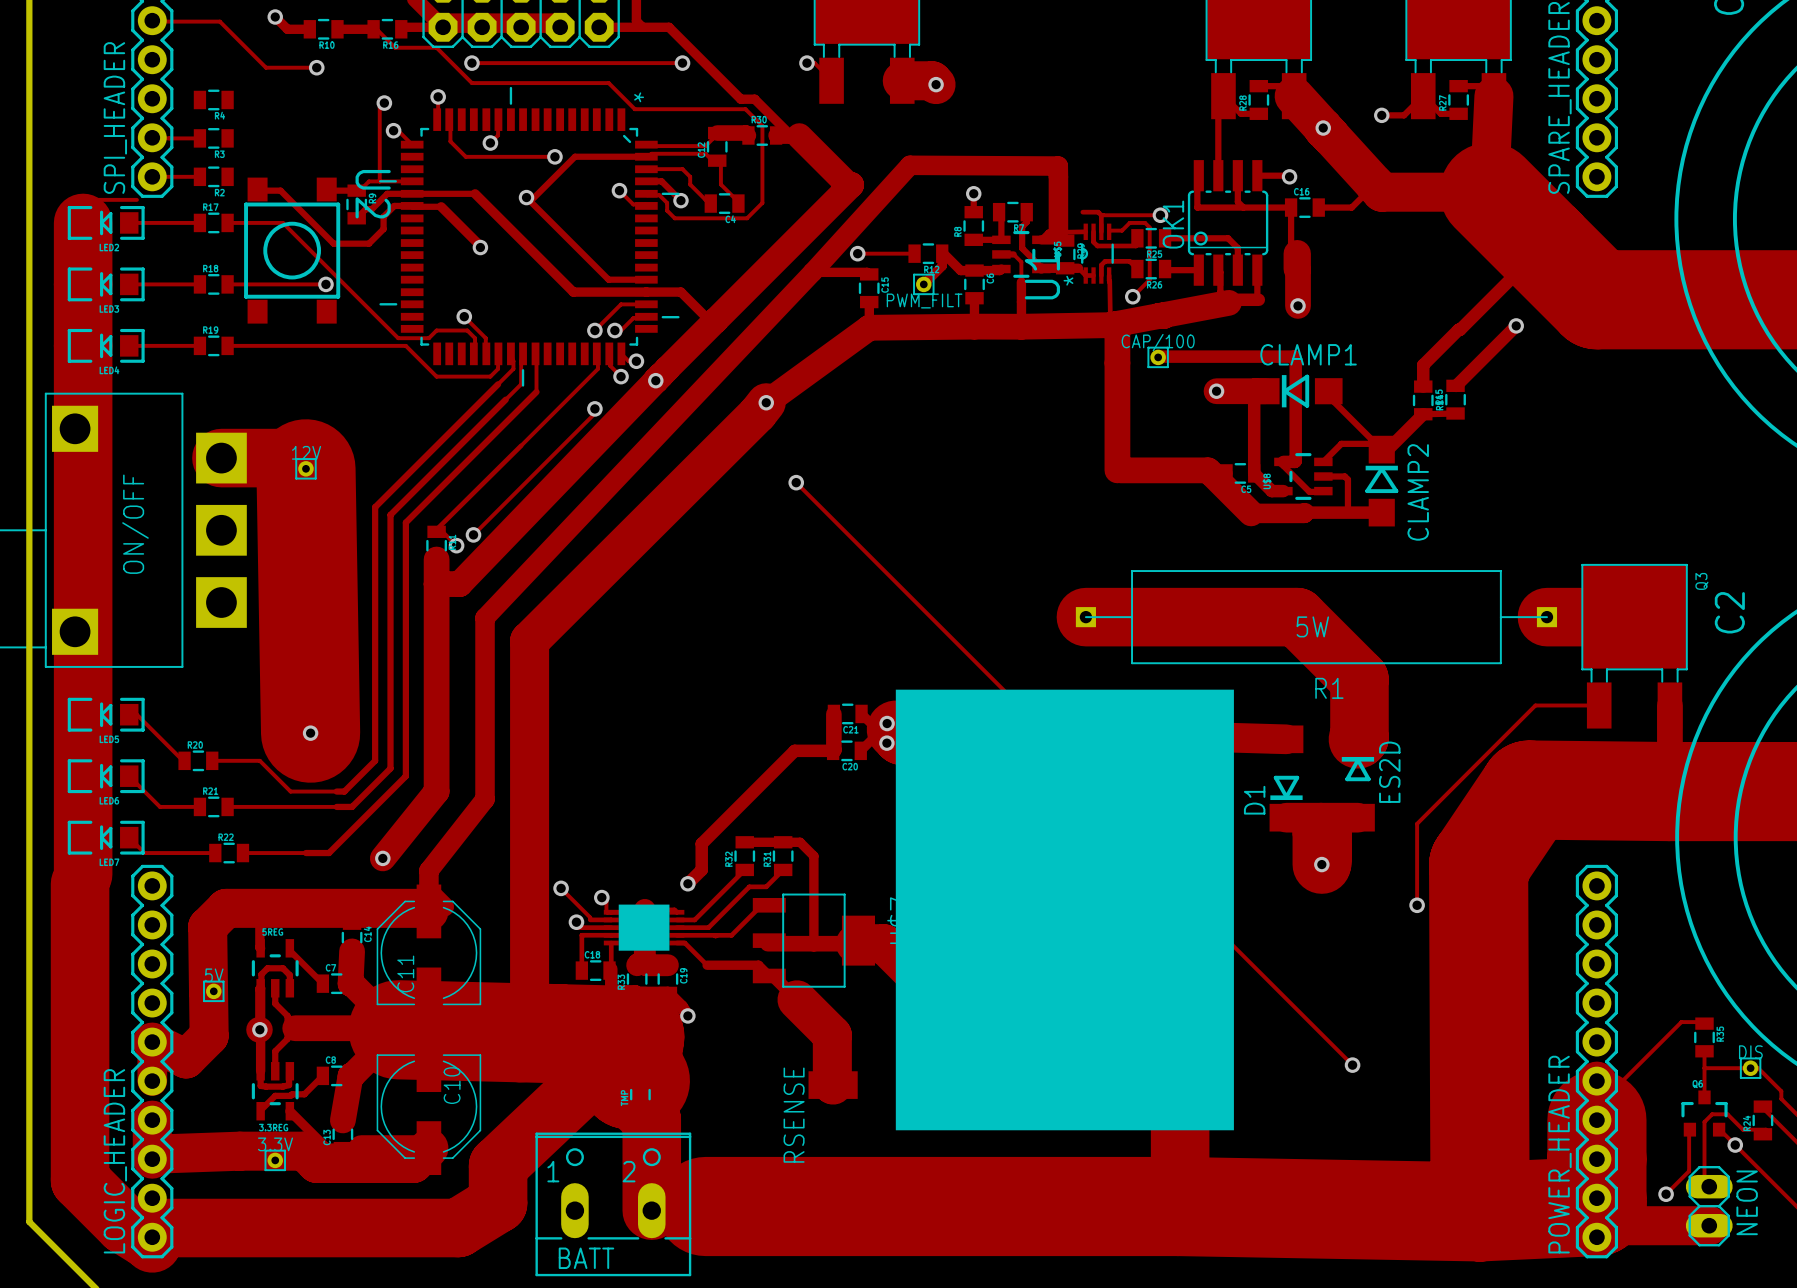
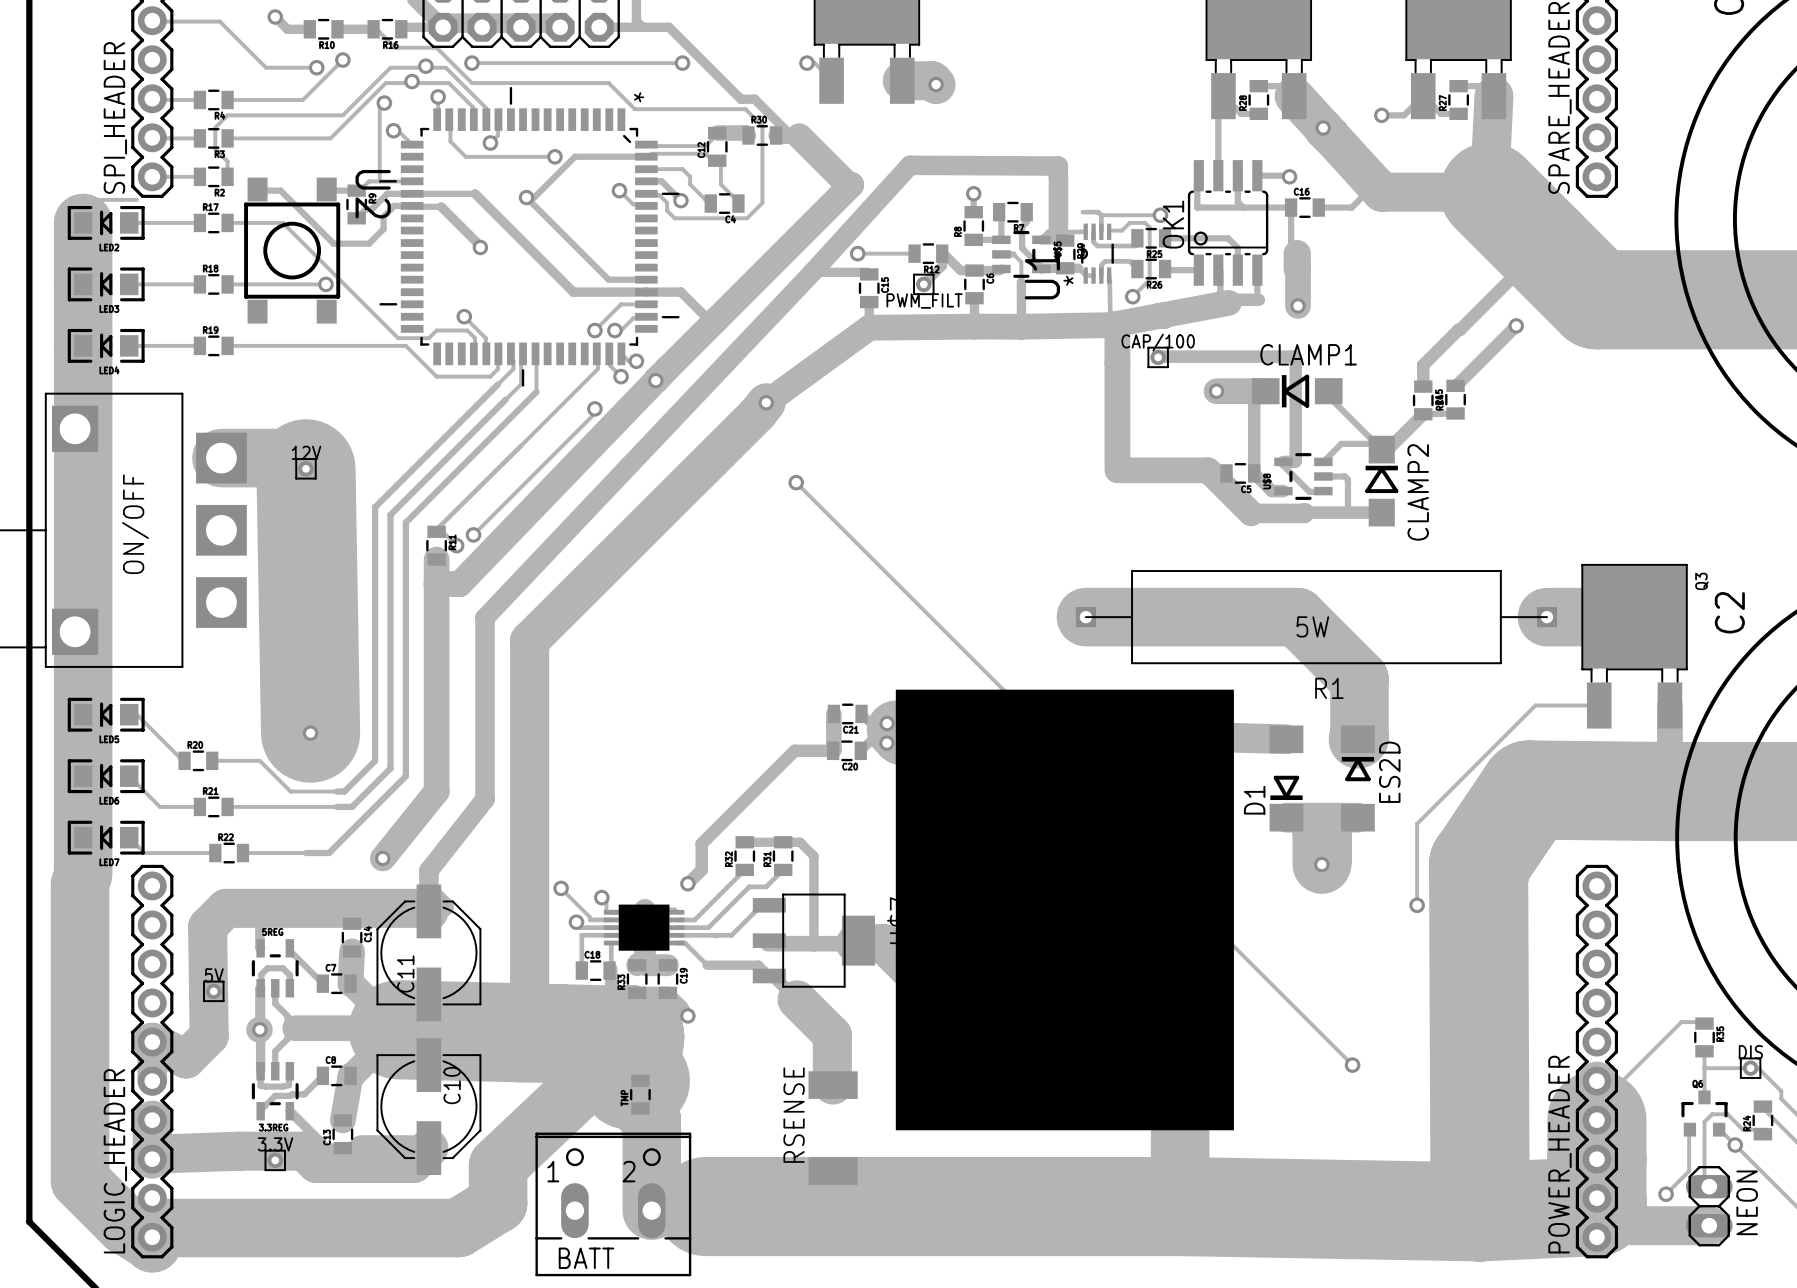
track: none -> (342, 60) (302, 99) (227, 99)
via: none -> (342, 60)
via: none -> (425, 66)
via: none -> (412, 81)
track: none -> (152, 98) (199, 99)
track: none -> (473, 119) (473, 107) (448, 83) (385, 83) (330, 138) (227, 138)
track: none -> (486, 119) (485, 107) (445, 67) (390, 67) (342, 115) (227, 115) (215, 127) (215, 149) (227, 161) (227, 176)

